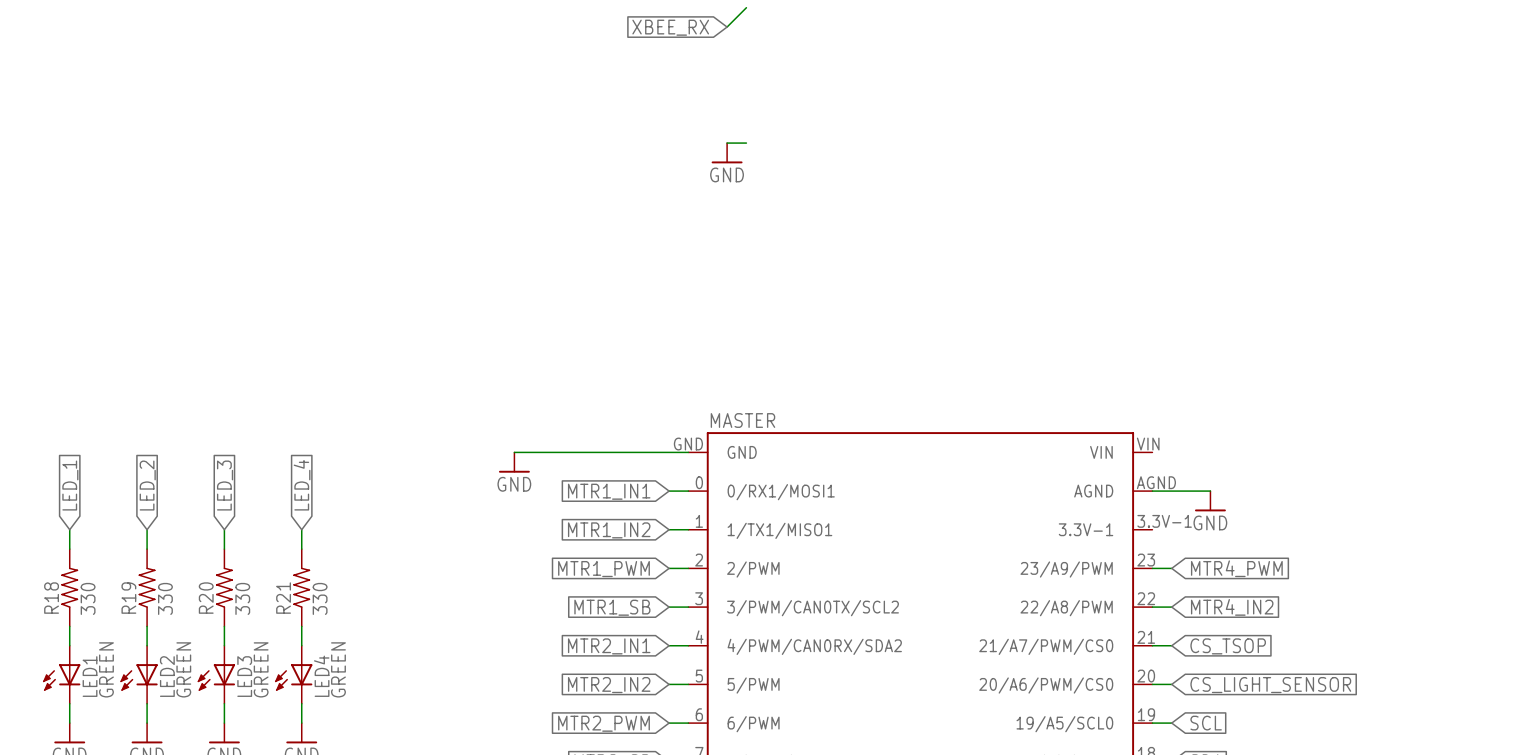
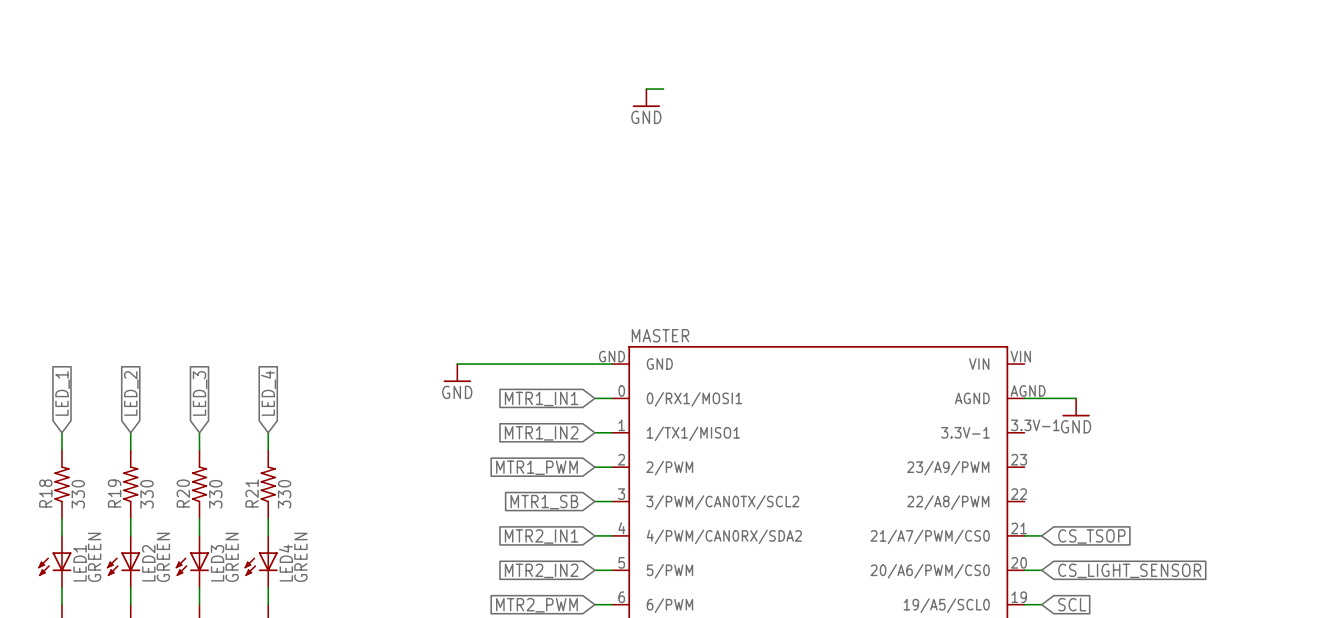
wire: (1152, 568) (1171, 568) -> none
global label: MTR4_PWM (1236, 568) -> none
wire: (1152, 607) (1171, 607) -> none
global label: MTR4_IN2 (1232, 607) -> none

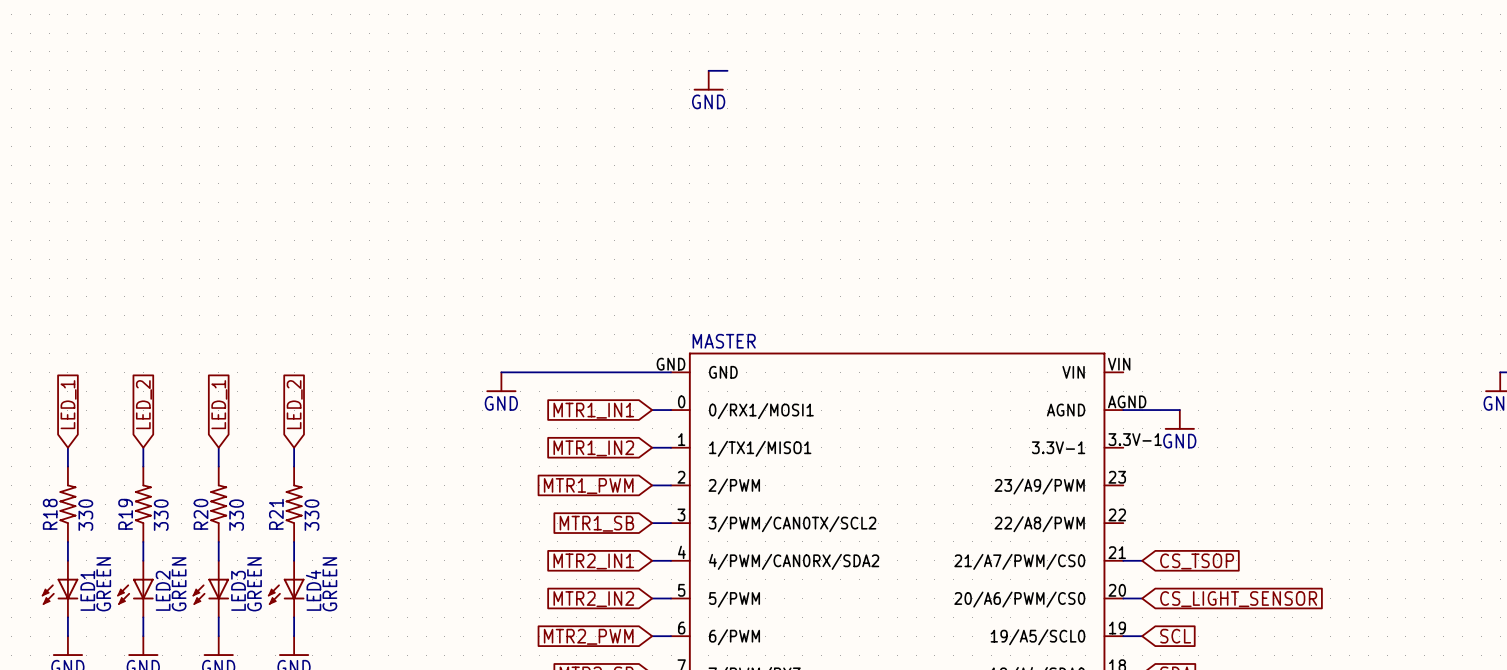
global label: LED_3 (200, 393) -> LED_1 (219, 404)
global label: LED_4 (268, 393) -> LED_2 (294, 404)

